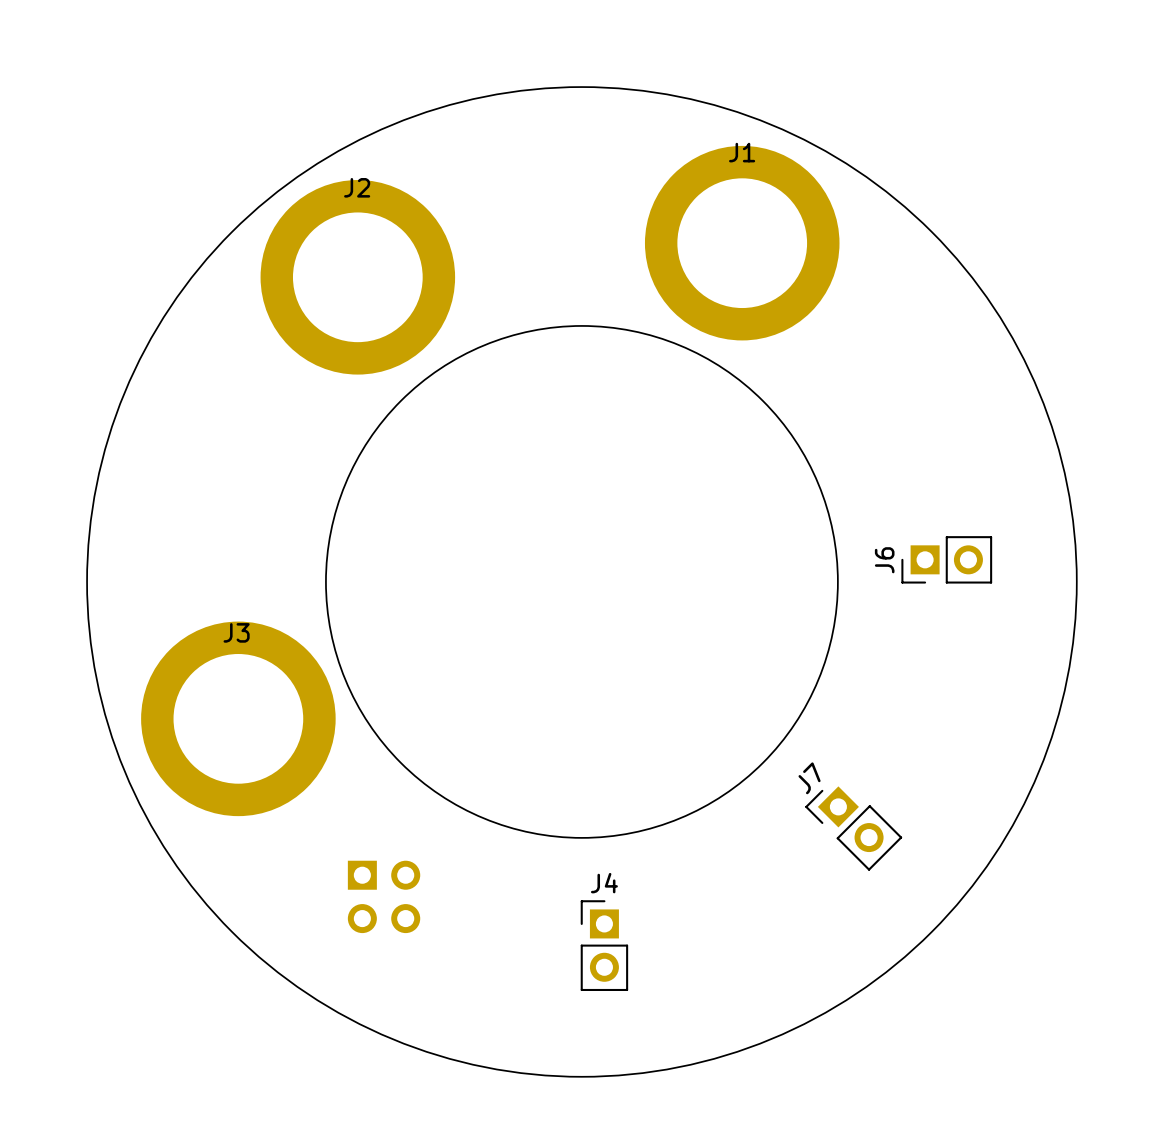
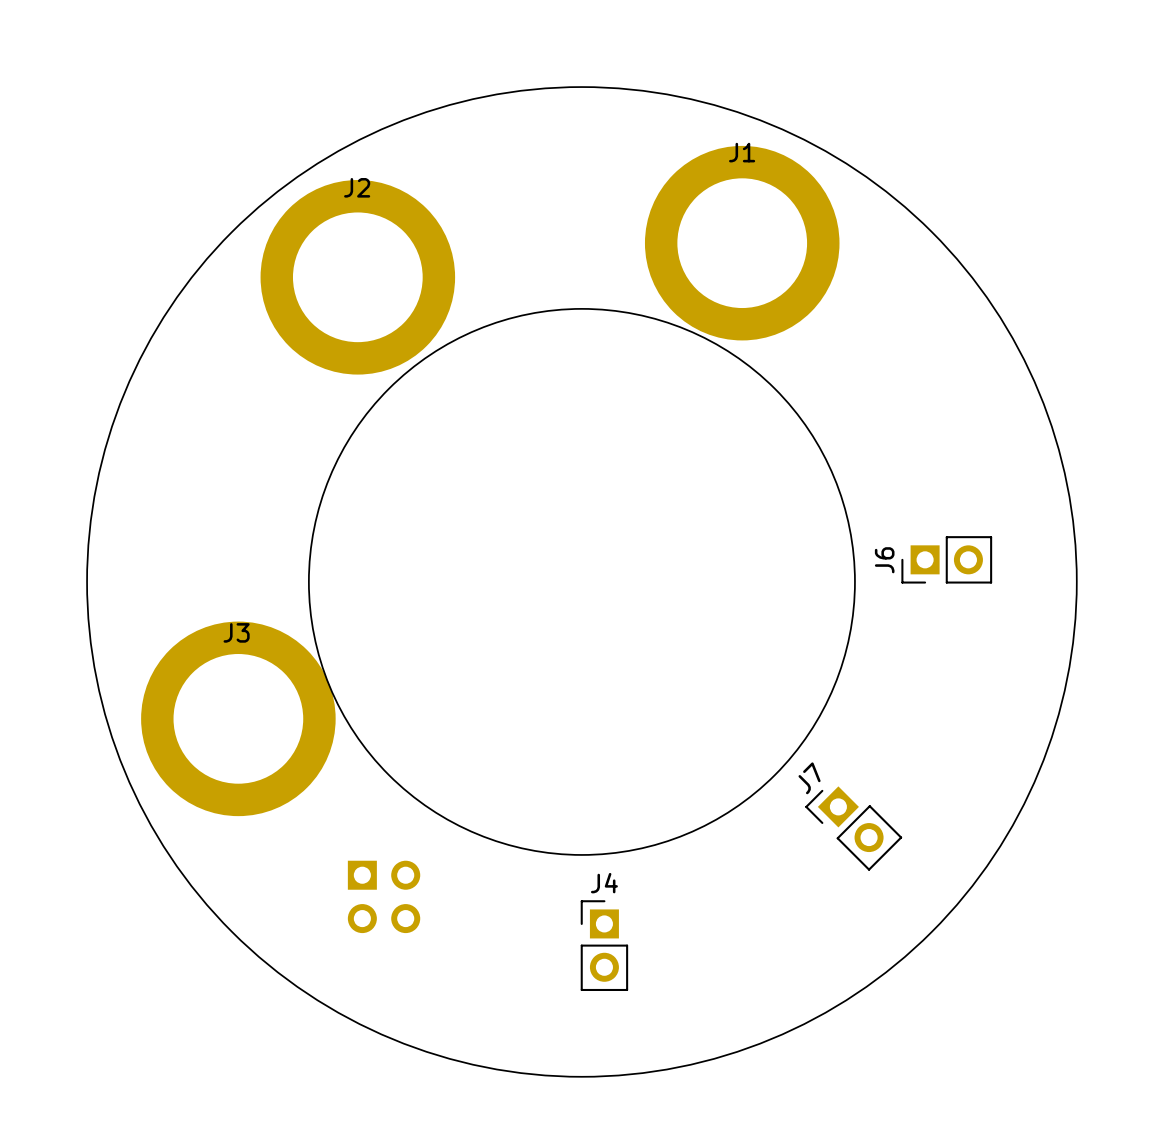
round board edge size: [325, 325, 839, 839] -> [308, 308, 856, 856]

